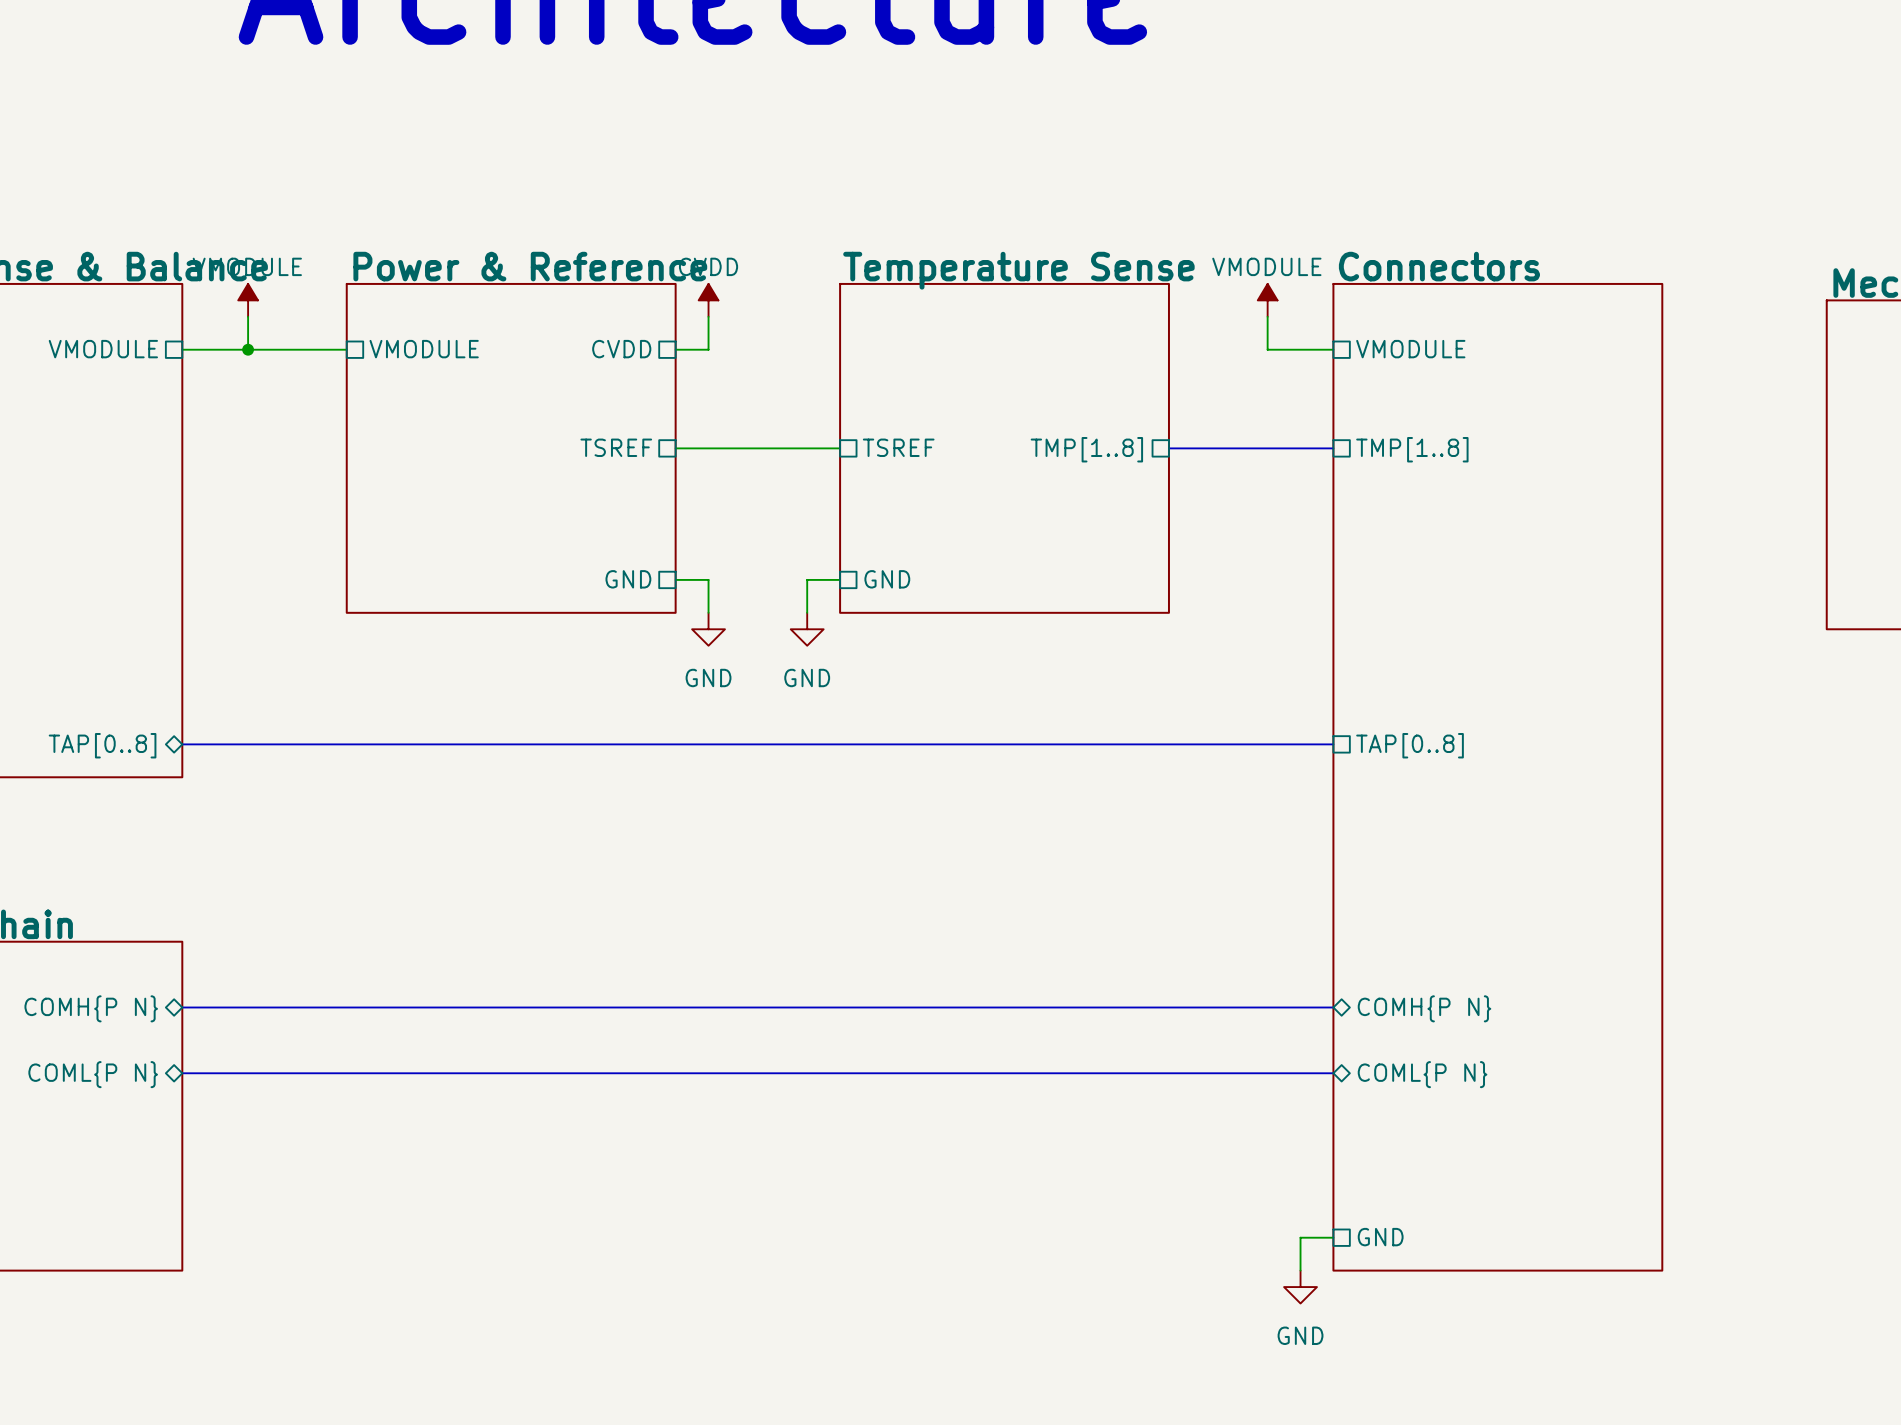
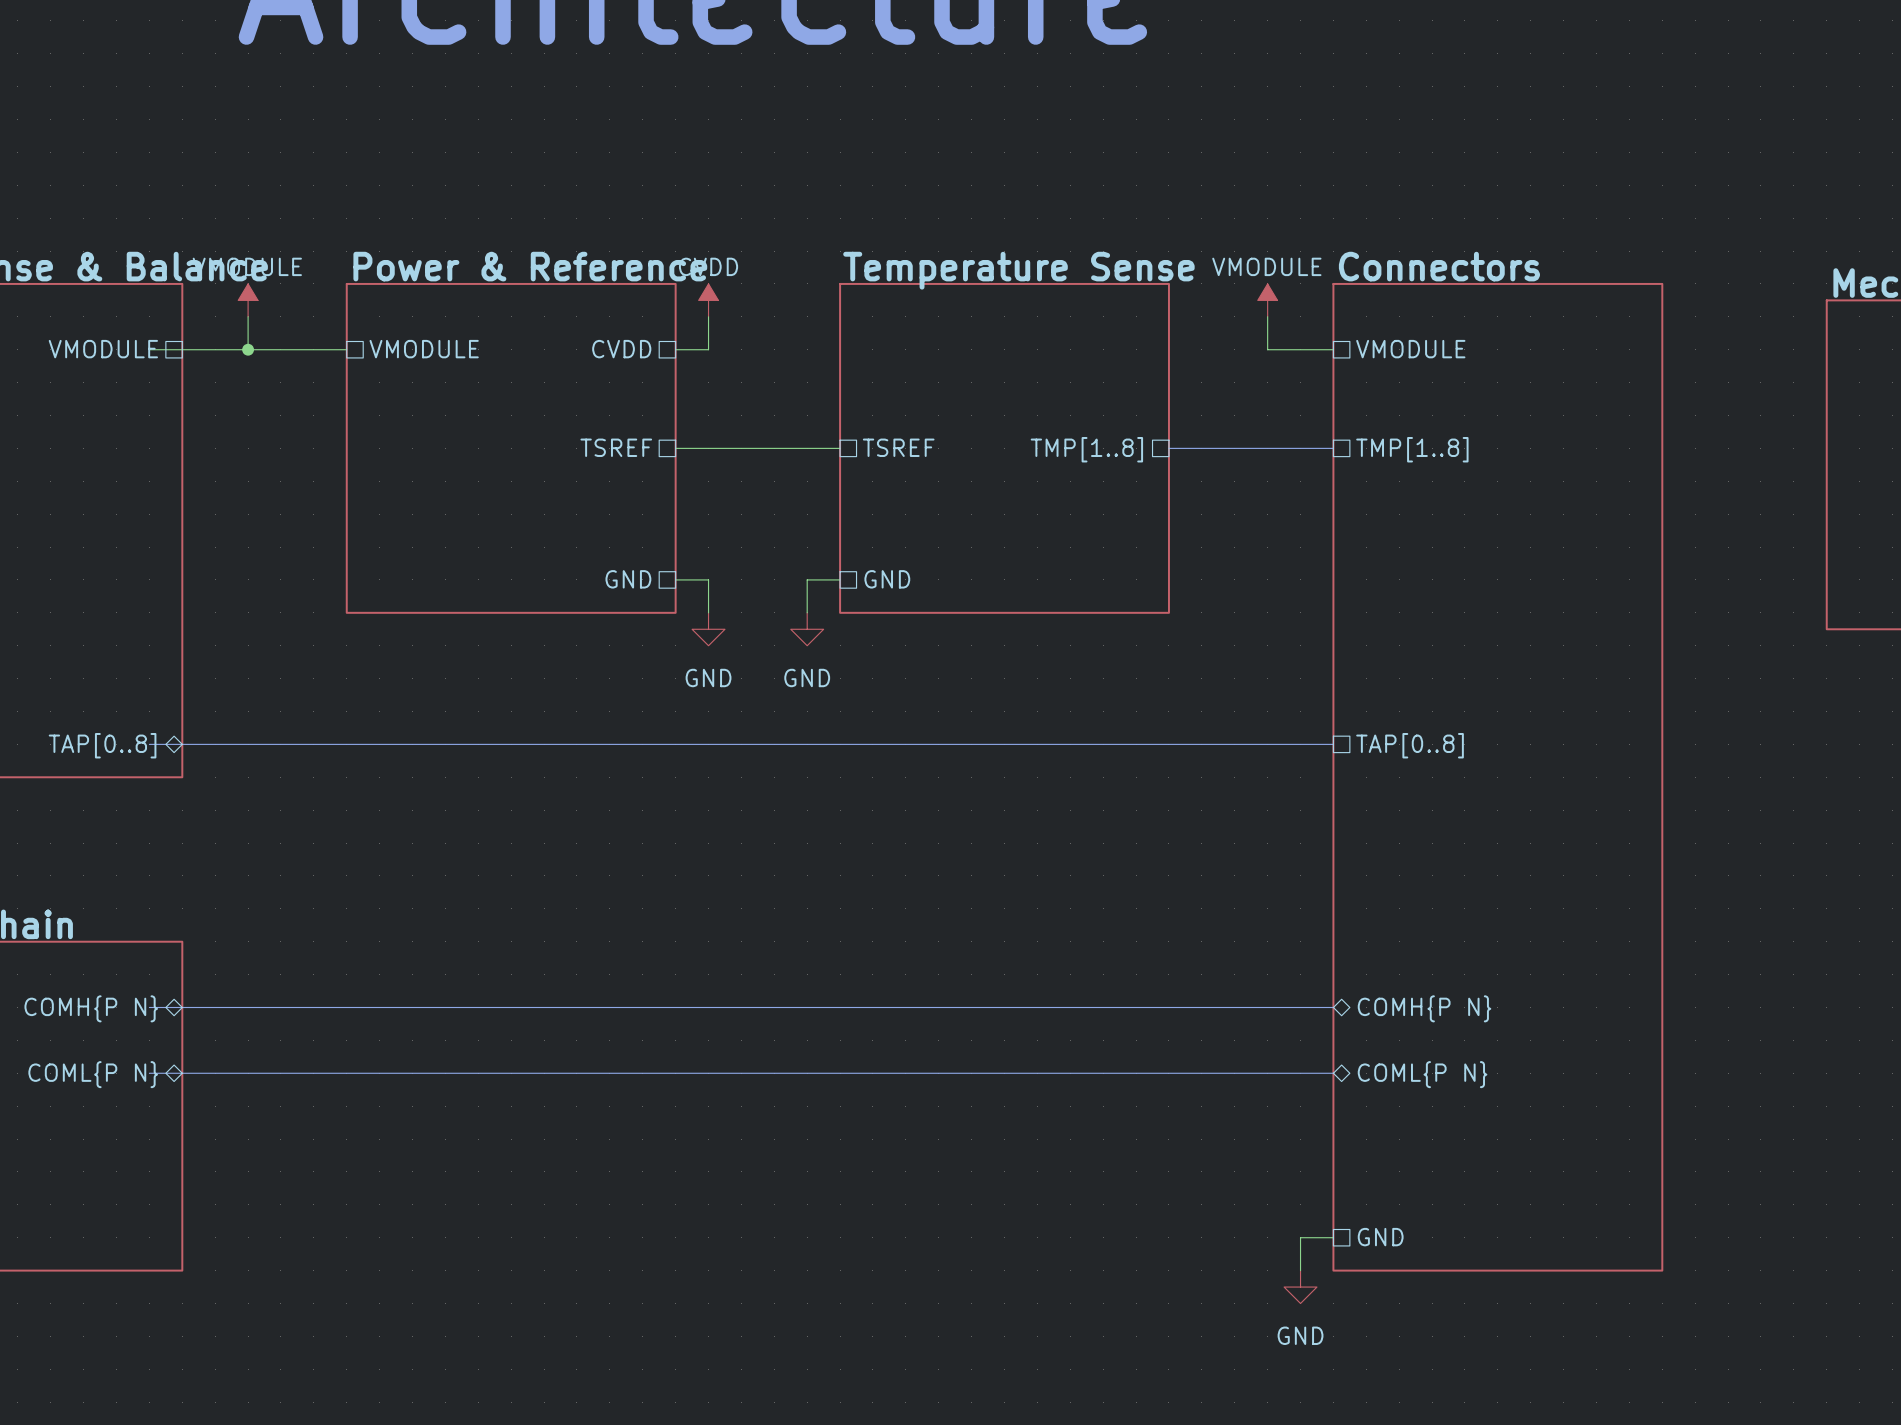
wire: none -> (149, 349) (182, 349)
bus: none -> (149, 744) (182, 744)
bus: none -> (149, 1007) (182, 1007)
bus: none -> (149, 1073) (182, 1073)

